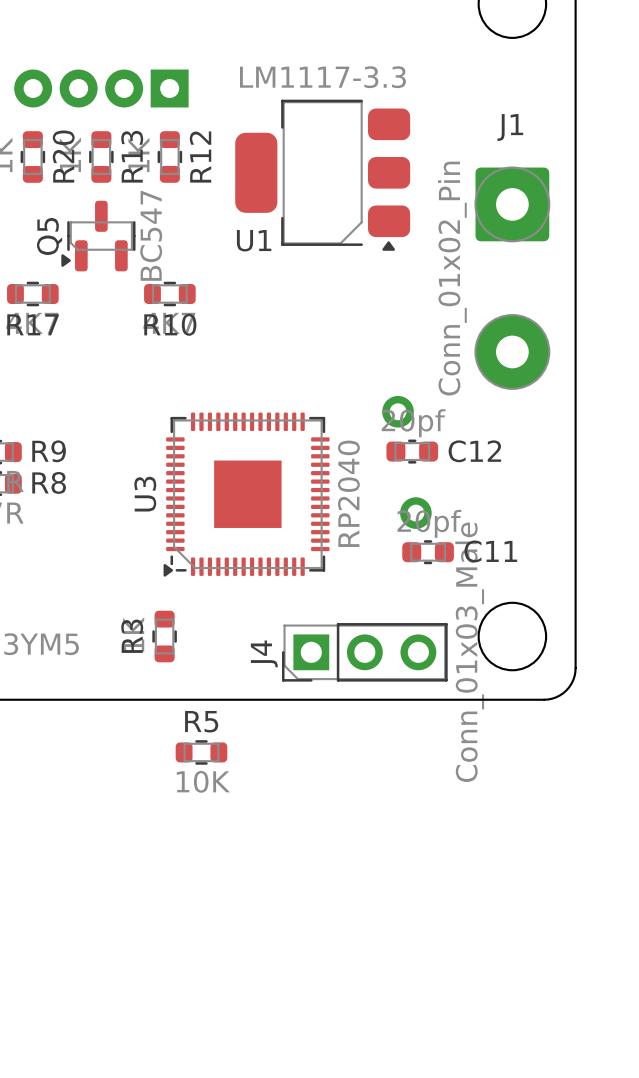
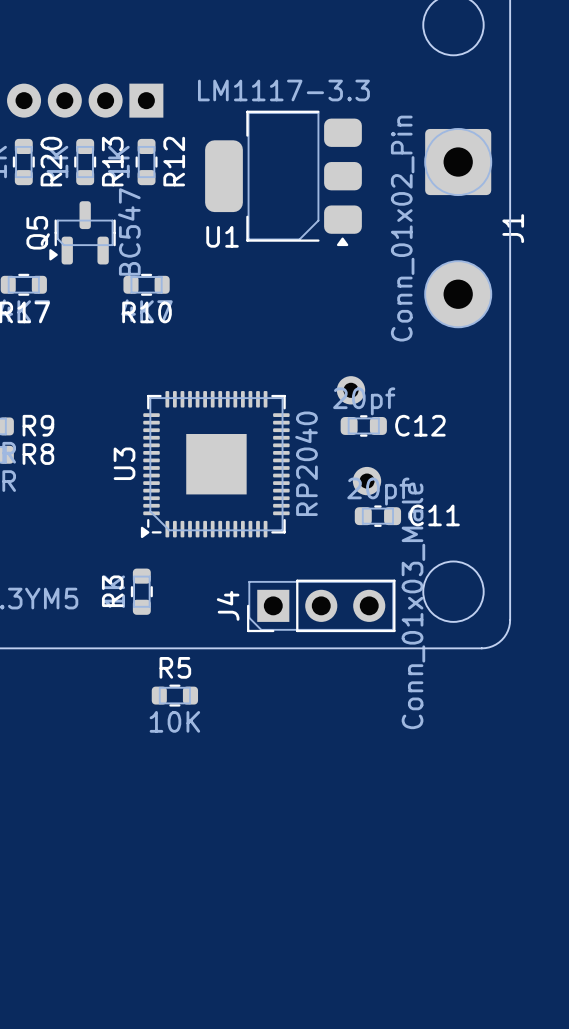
J1 name rotation: 0° (510, 127) -> 90° counterclockwise (513, 228)
J1 name position: J1 (510, 127) -> J1 (513, 228)
J1 position: (512, 278) -> (458, 228)

